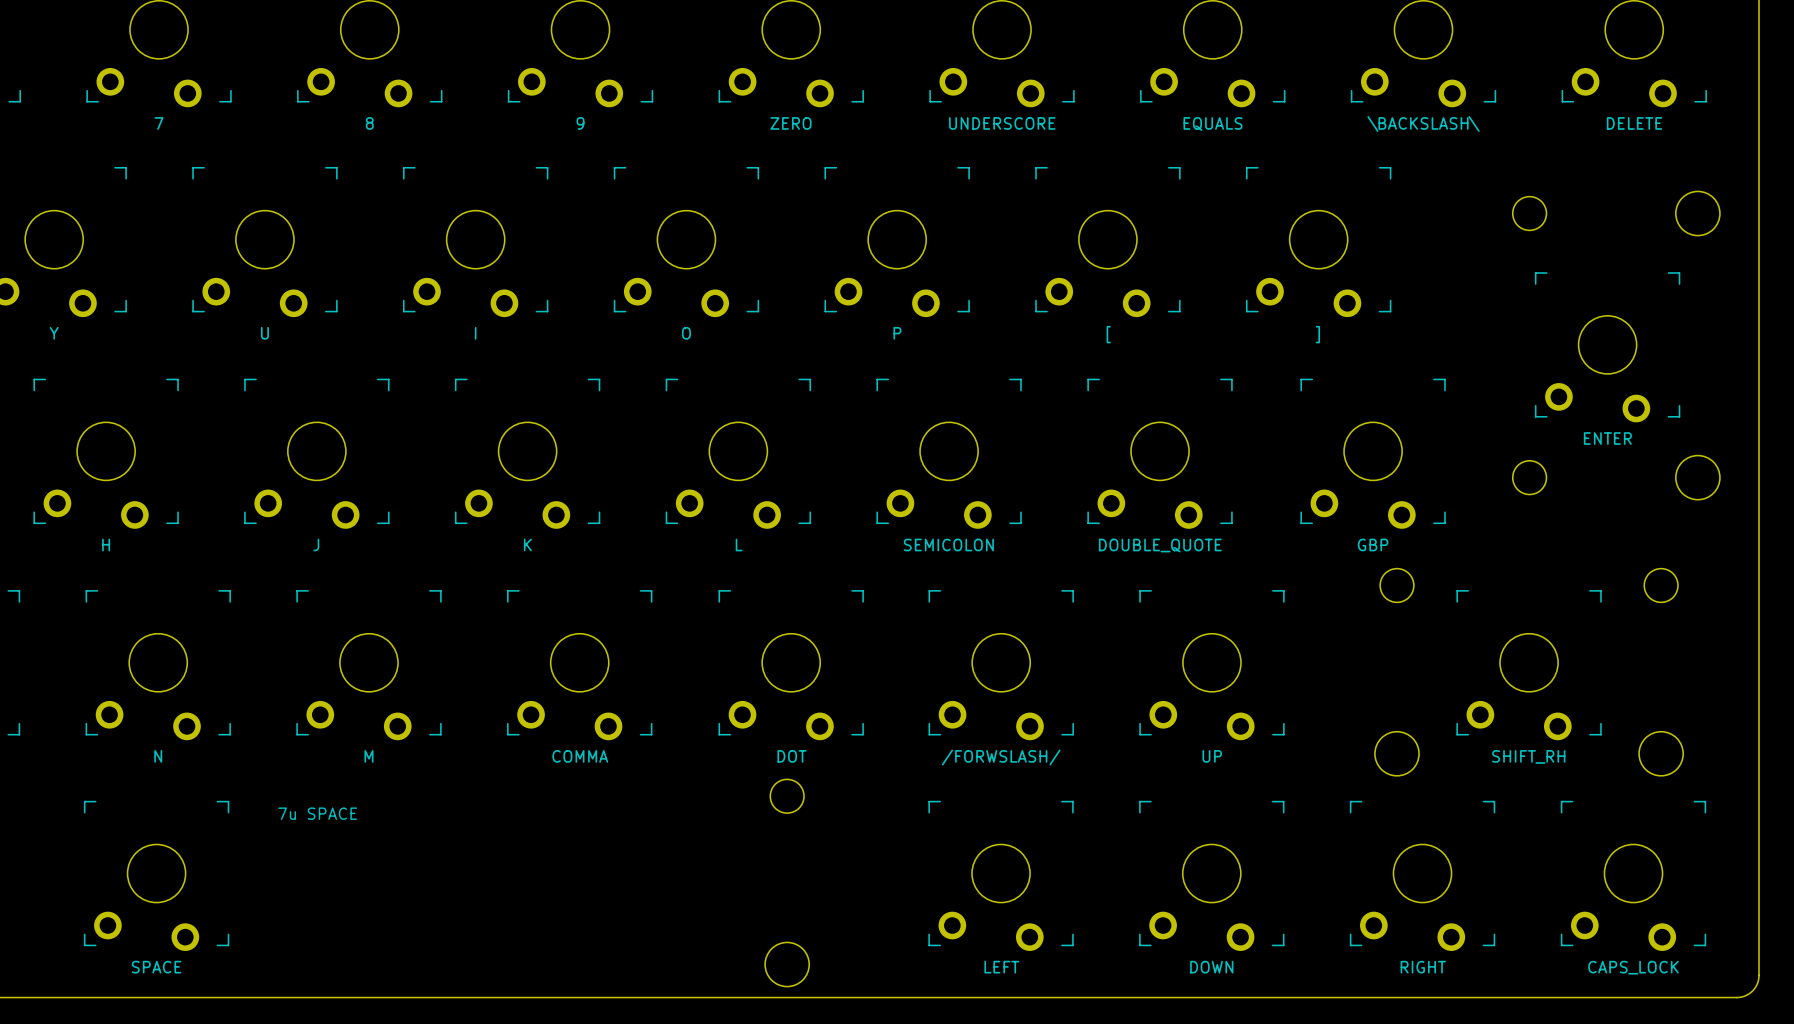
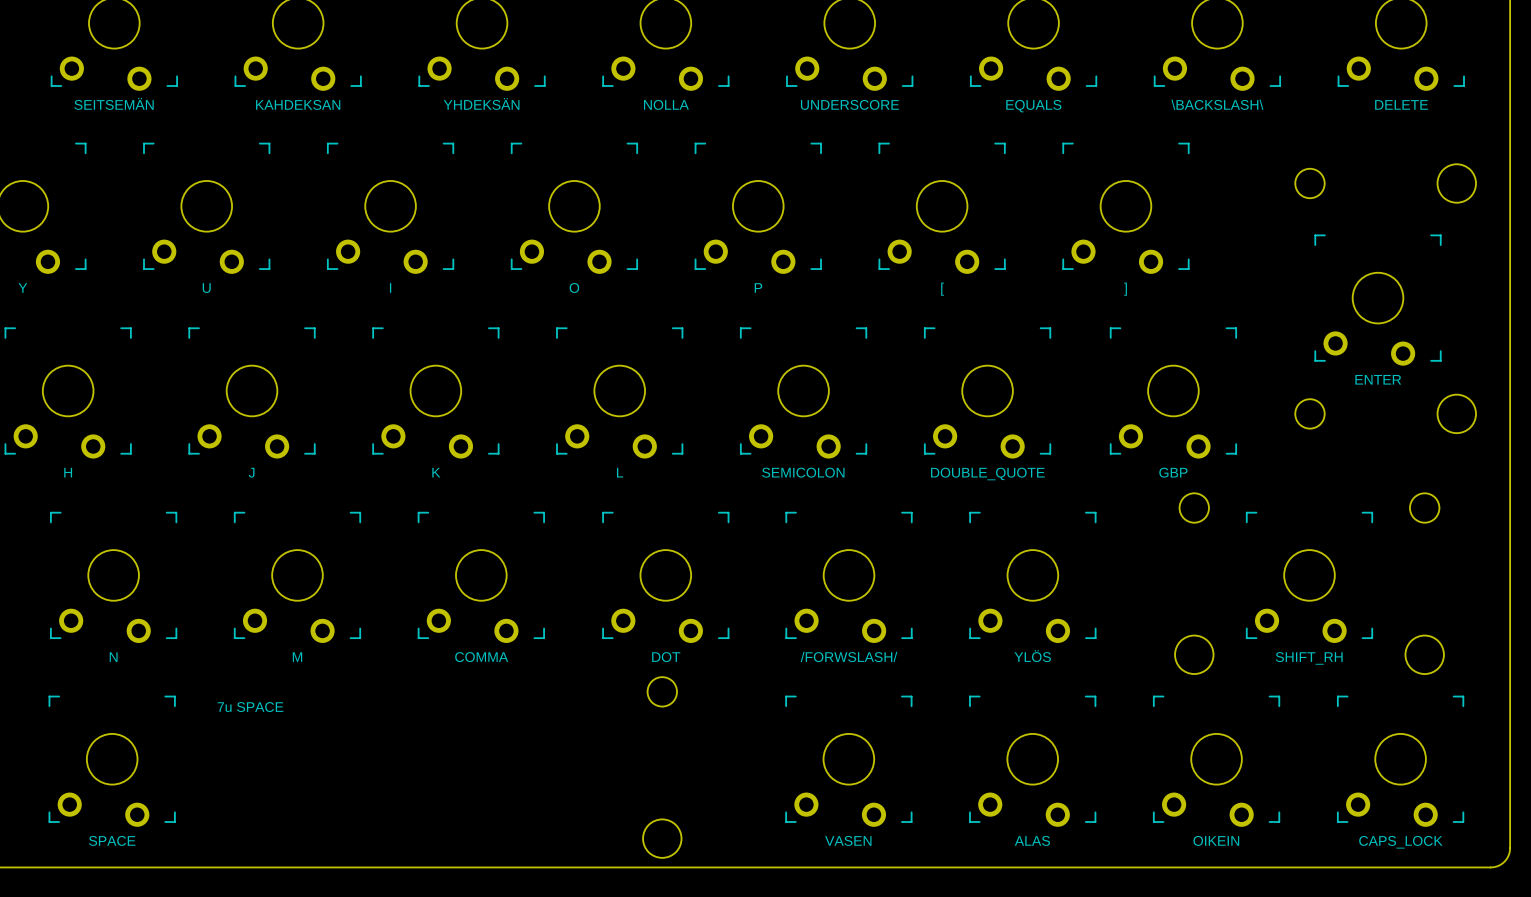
part value: 7 (159, 123) -> SEITSEMÄN (114, 103)
part value: 8 (369, 123) -> KAHDEKSAN (298, 104)
part value: 9 (580, 123) -> YHDEKSÄN (481, 103)
part value: ZERO (791, 123) -> NOLLA (666, 104)
part value: UP (1212, 756) -> YLÖS (1032, 656)
part value: LEFT (1001, 967) -> VASEN (848, 840)
part value: DOWN (1211, 967) -> ALAS (1032, 840)
part value: RIGHT (1423, 967) -> OIKEIN (1216, 840)

